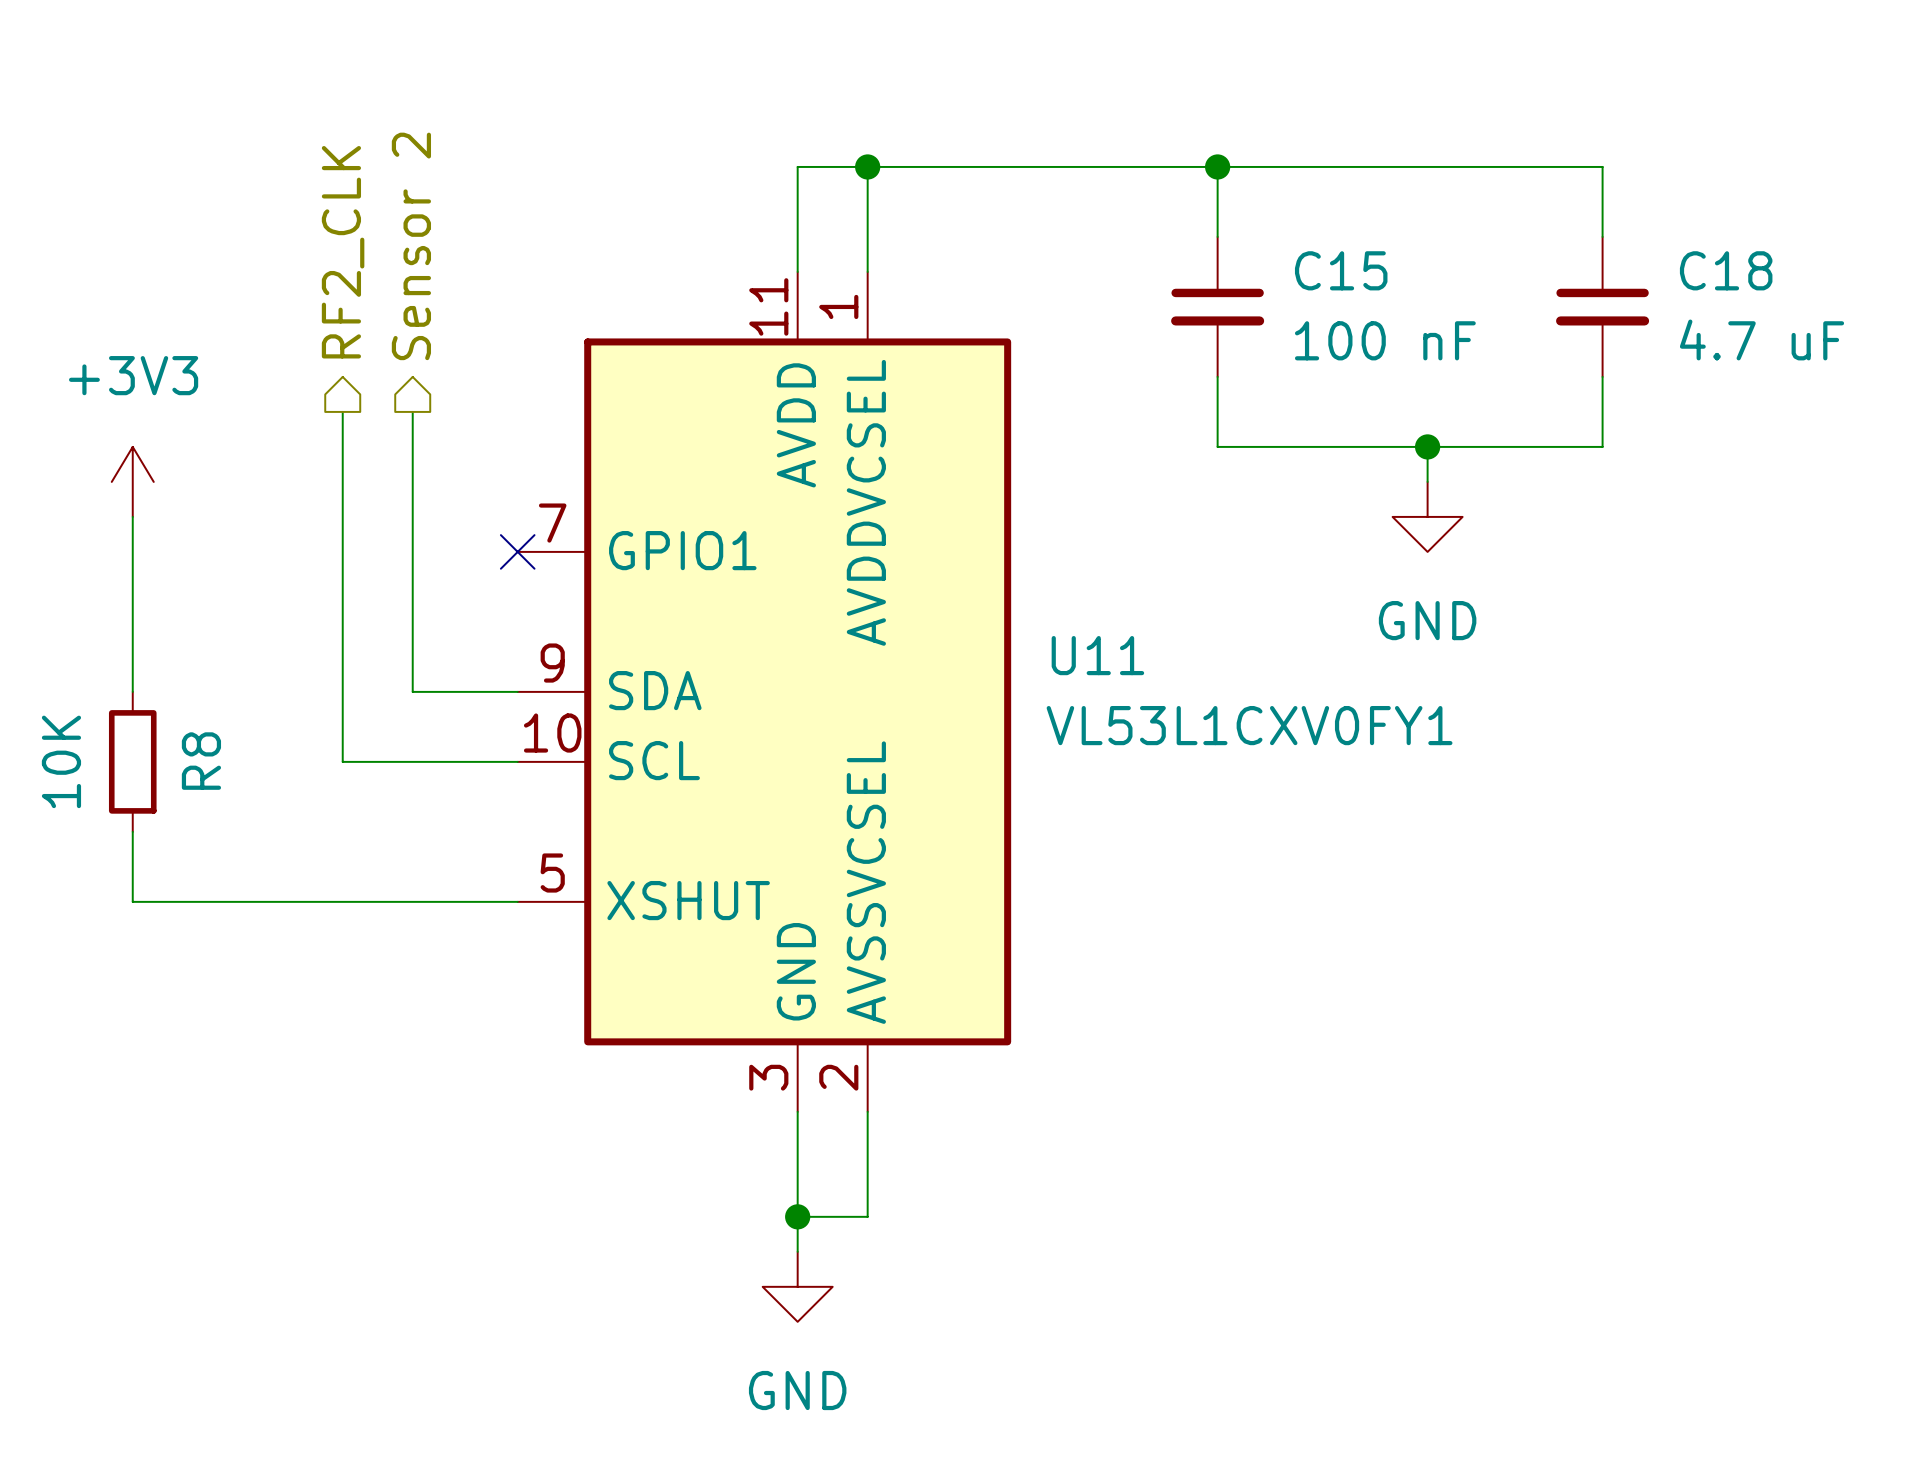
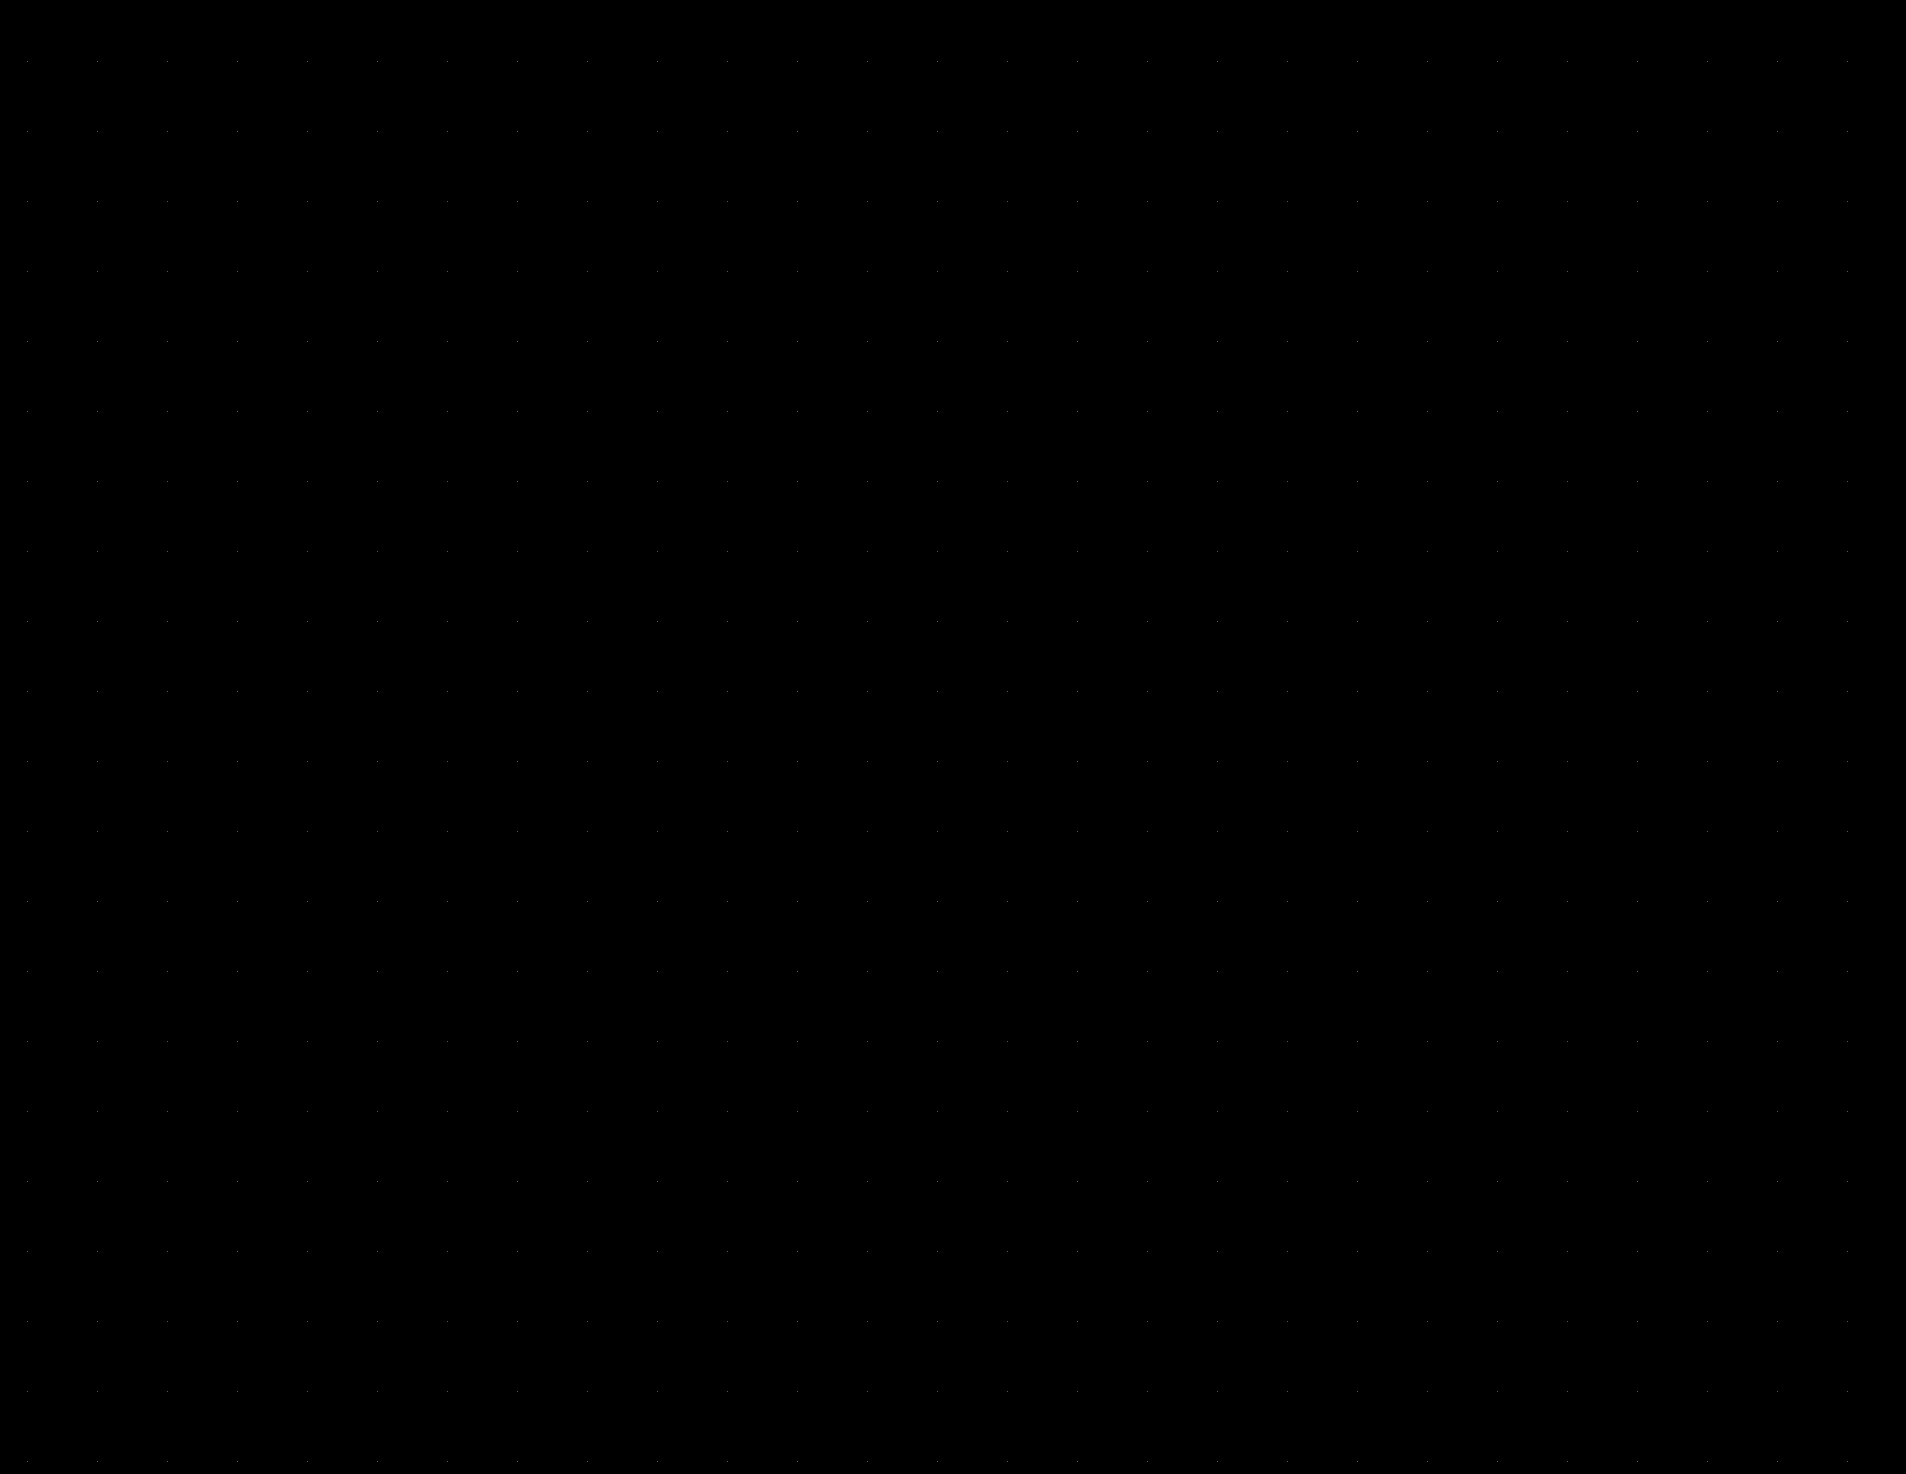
wire: (867, 166) (867, 271) -> none
junction: (867, 166) -> none
wire: (1217, 166) (1217, 236) -> none
junction: (1217, 166) -> none
wire: (1602, 236) (1602, 166) (797, 166) (797, 271) -> none
hierarchical label: Sensor 2 (411, 246) -> none
hierarchical label: RF2_CLK (343, 252) -> none
C15: 100 nF (1217, 306) -> none
C18: 4.7 uF (1602, 306) -> none
wire: (1217, 376) (1217, 446) (1602, 446) (1602, 376) -> none
wire: (342, 411) (342, 761) (517, 761) -> none
wire: (412, 411) (412, 691) (517, 691) -> none
wire: (1427, 446) (1427, 481) -> none
junction: (1427, 446) -> none
power symbol: +3V3 (132, 481) -> none
wire: (132, 516) (132, 691) -> none
power symbol: GND (1427, 516) -> none
no-connect mark: (517, 551) -> none
U11: VL53L1CXV0FY1 (764, 691) -> none
R8: 10K (132, 761) -> none
wire: (132, 831) (132, 901) (517, 901) -> none
wire: (797, 1111) (797, 1251) -> none
wire: (867, 1111) (867, 1216) (797, 1216) -> none
junction: (797, 1216) -> none
power symbol: GND (797, 1286) -> none

